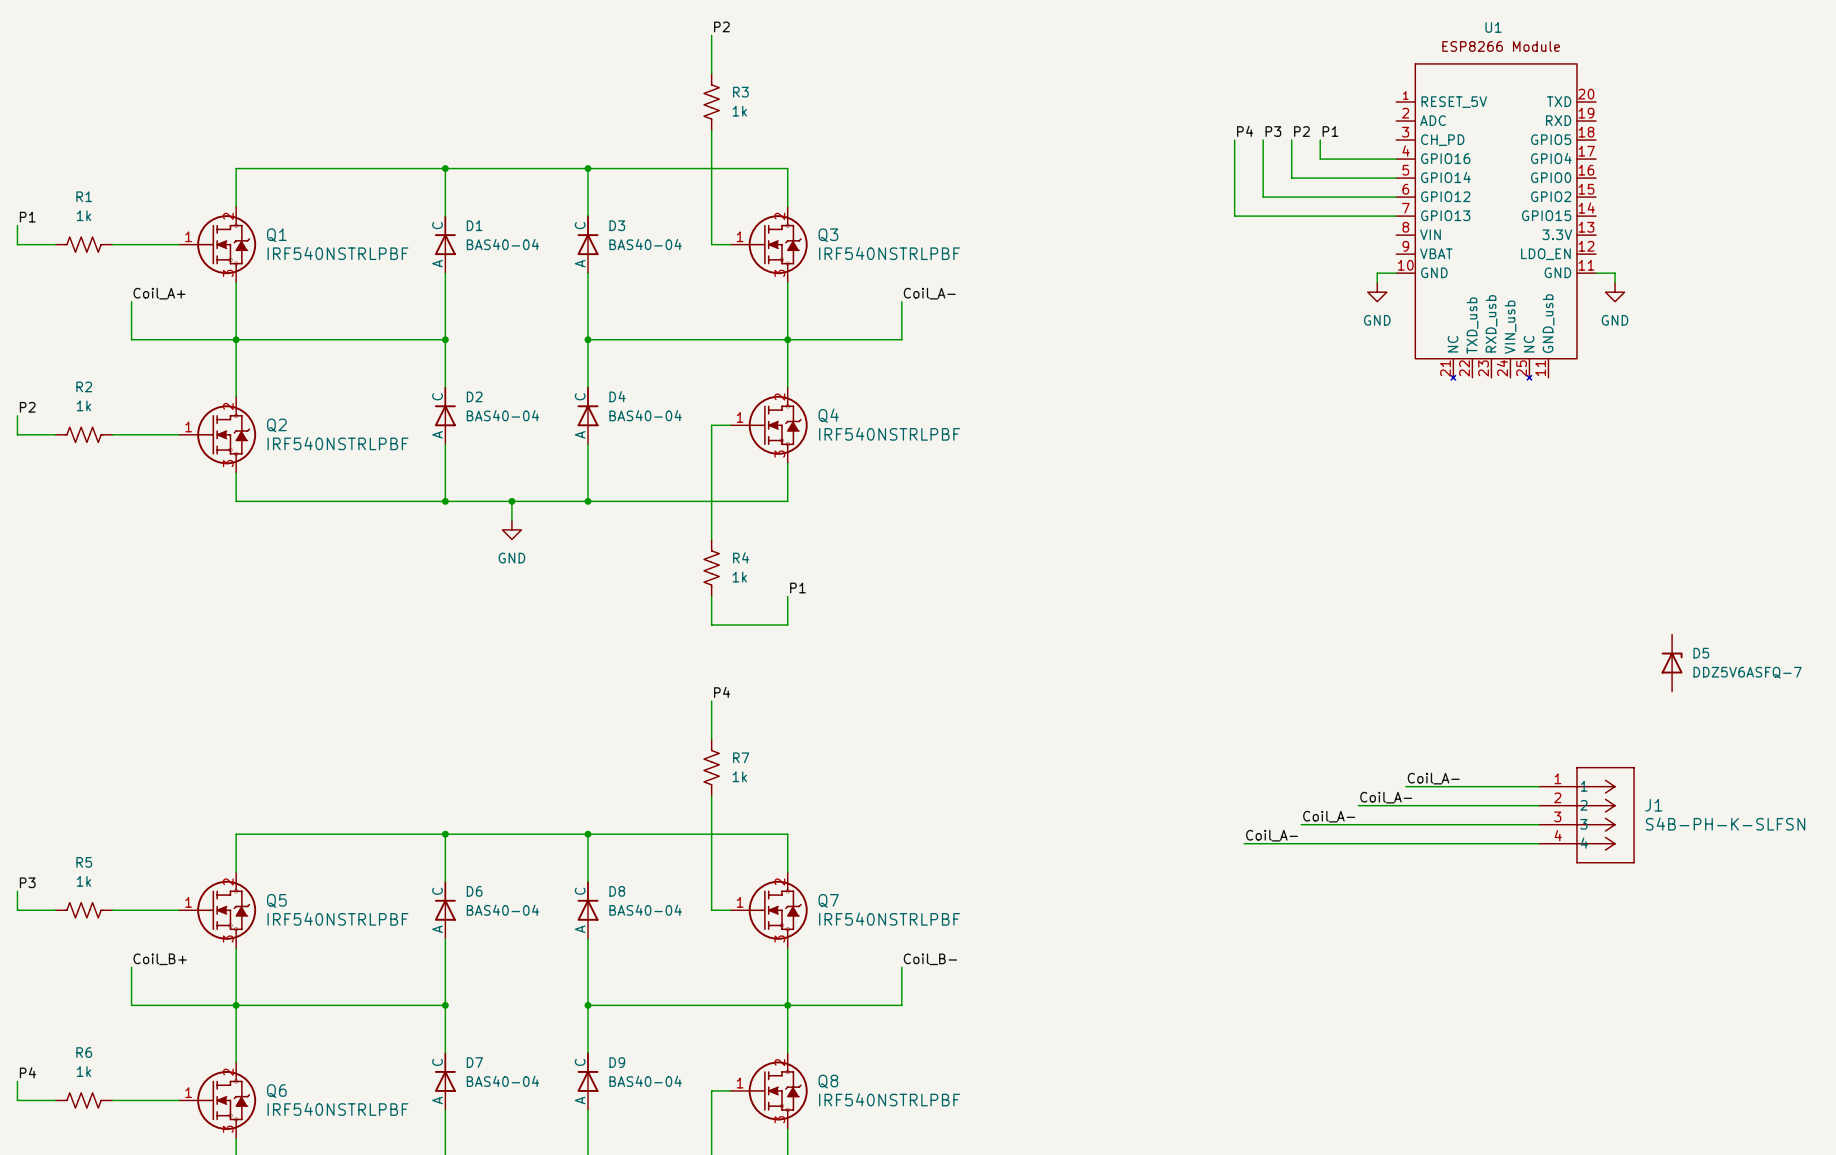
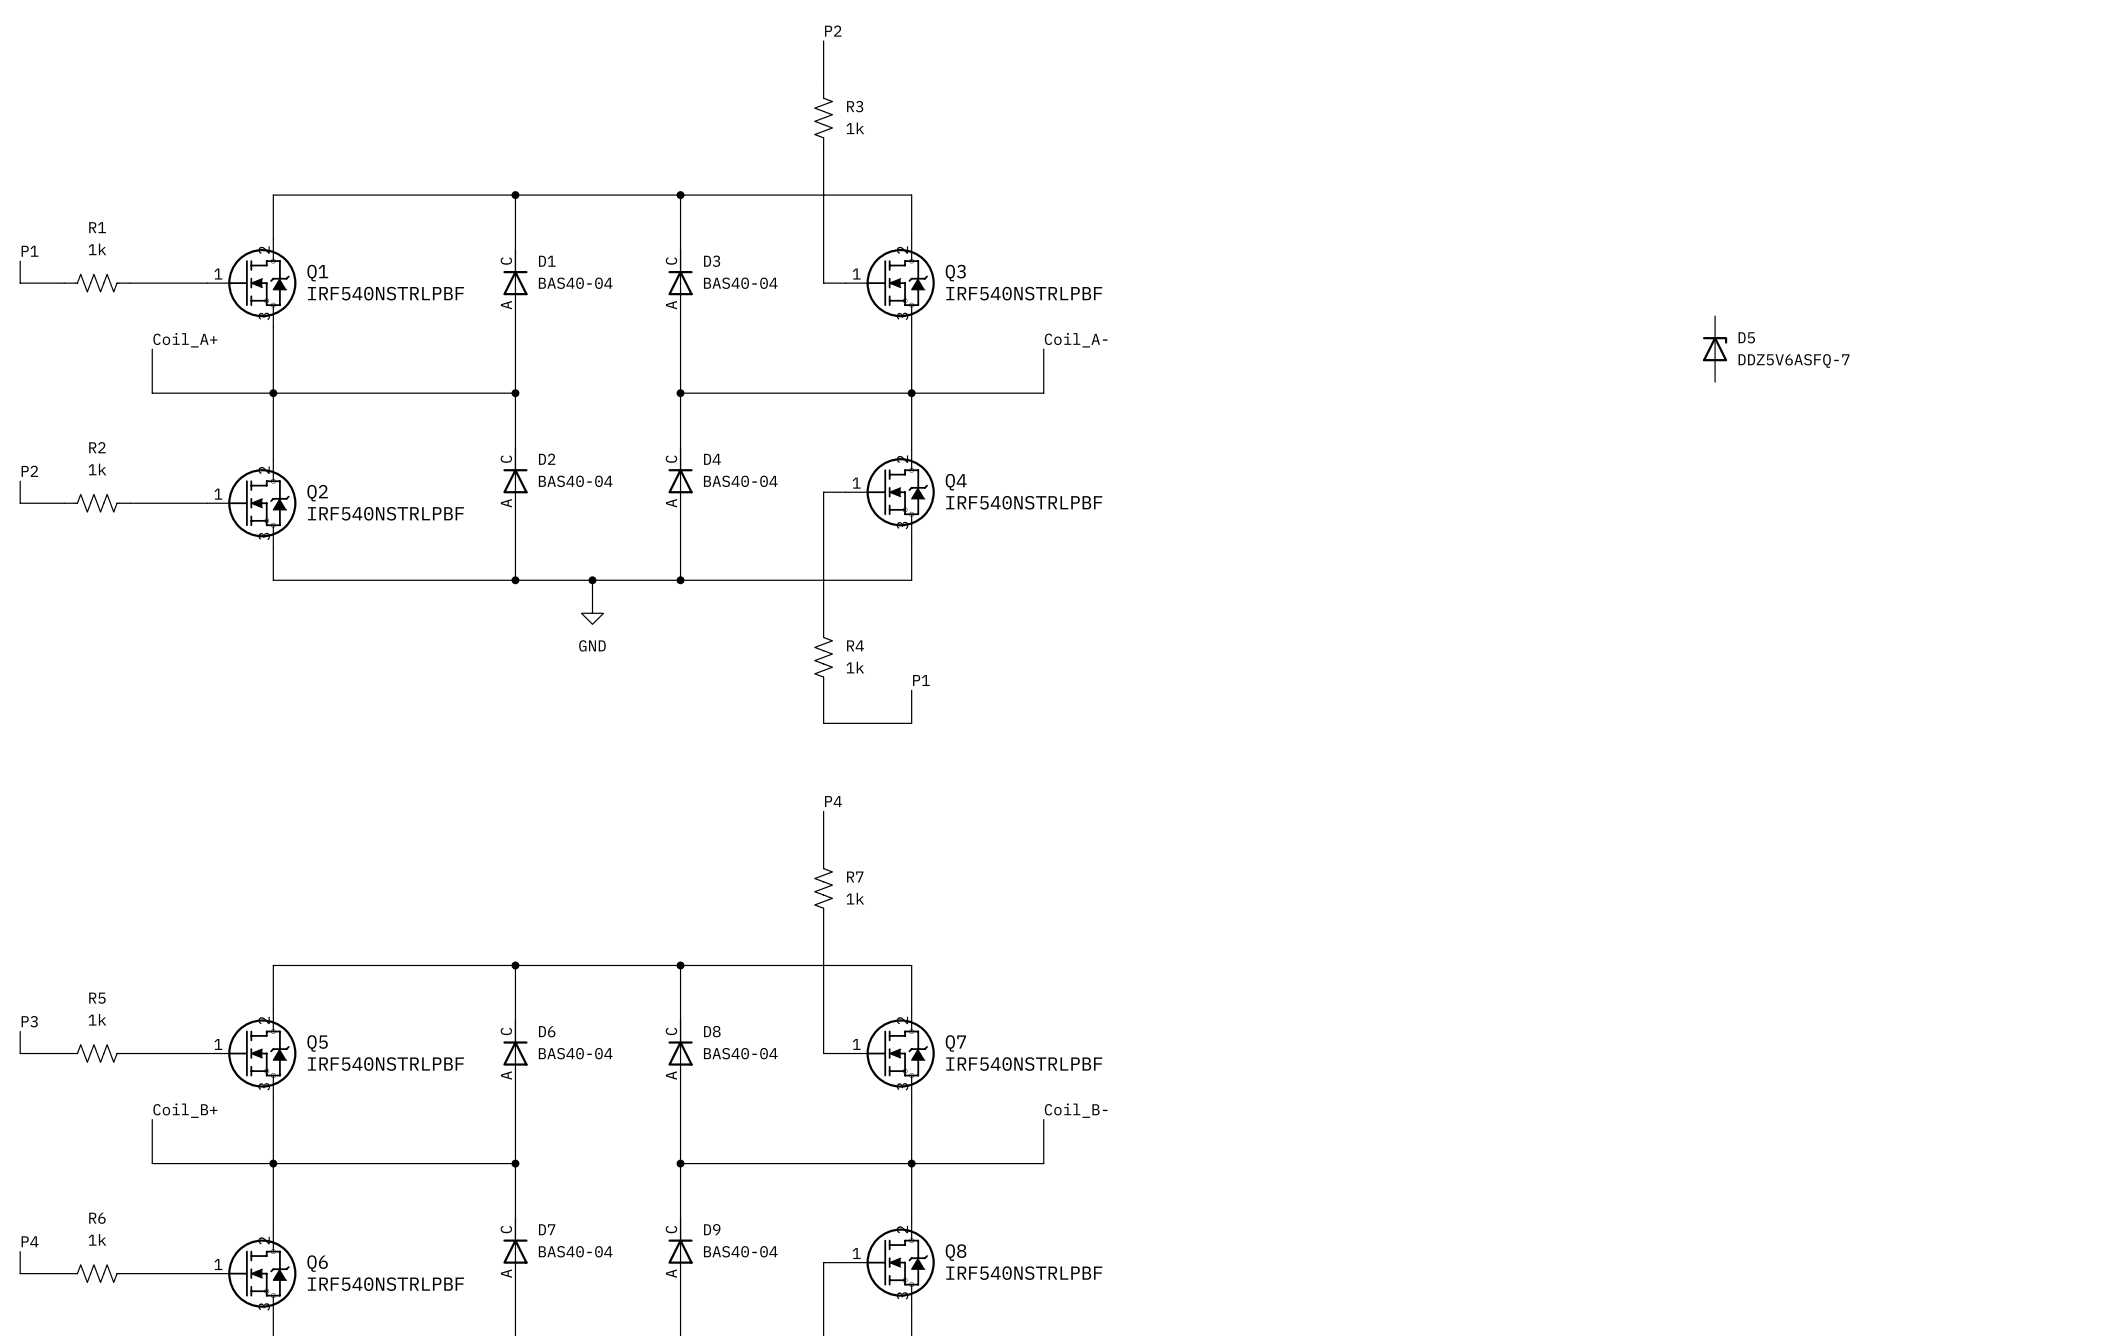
label: P4 (1245, 131) -> none
label: P3 (1273, 131) -> none
label: P2 (1301, 131) -> none
label: P1 (1330, 131) -> none
wire: (1234, 140) (1234, 216) (1396, 216) -> none
wire: (1263, 140) (1263, 197) (1396, 197) -> none
wire: (1291, 140) (1291, 178) (1396, 178) -> none
wire: (1320, 140) (1320, 159) (1396, 159) -> none
U1: (1496, 221) -> none
wire: (1396, 273) (1377, 273) (1377, 282) -> none
wire: (1596, 273) (1615, 273) (1615, 282) -> none
power symbol: GND (1377, 292) -> none
power symbol: GND (1615, 292) -> none
D5 position: (1672, 663) -> (1715, 349)
label: Coil_A- (1433, 778) -> none
wire: (1405, 786) (1538, 786) -> none
label: Coil_A- (1386, 797) -> none
wire: (1358, 805) (1538, 805) -> none
J1: S4B-PH-K-SLFSN (1586, 815) -> none
label: Coil_A- (1329, 816) -> none
wire: (1301, 824) (1538, 824) -> none
label: Coil_A- (1272, 835) -> none
wire: (1244, 843) (1538, 843) -> none

